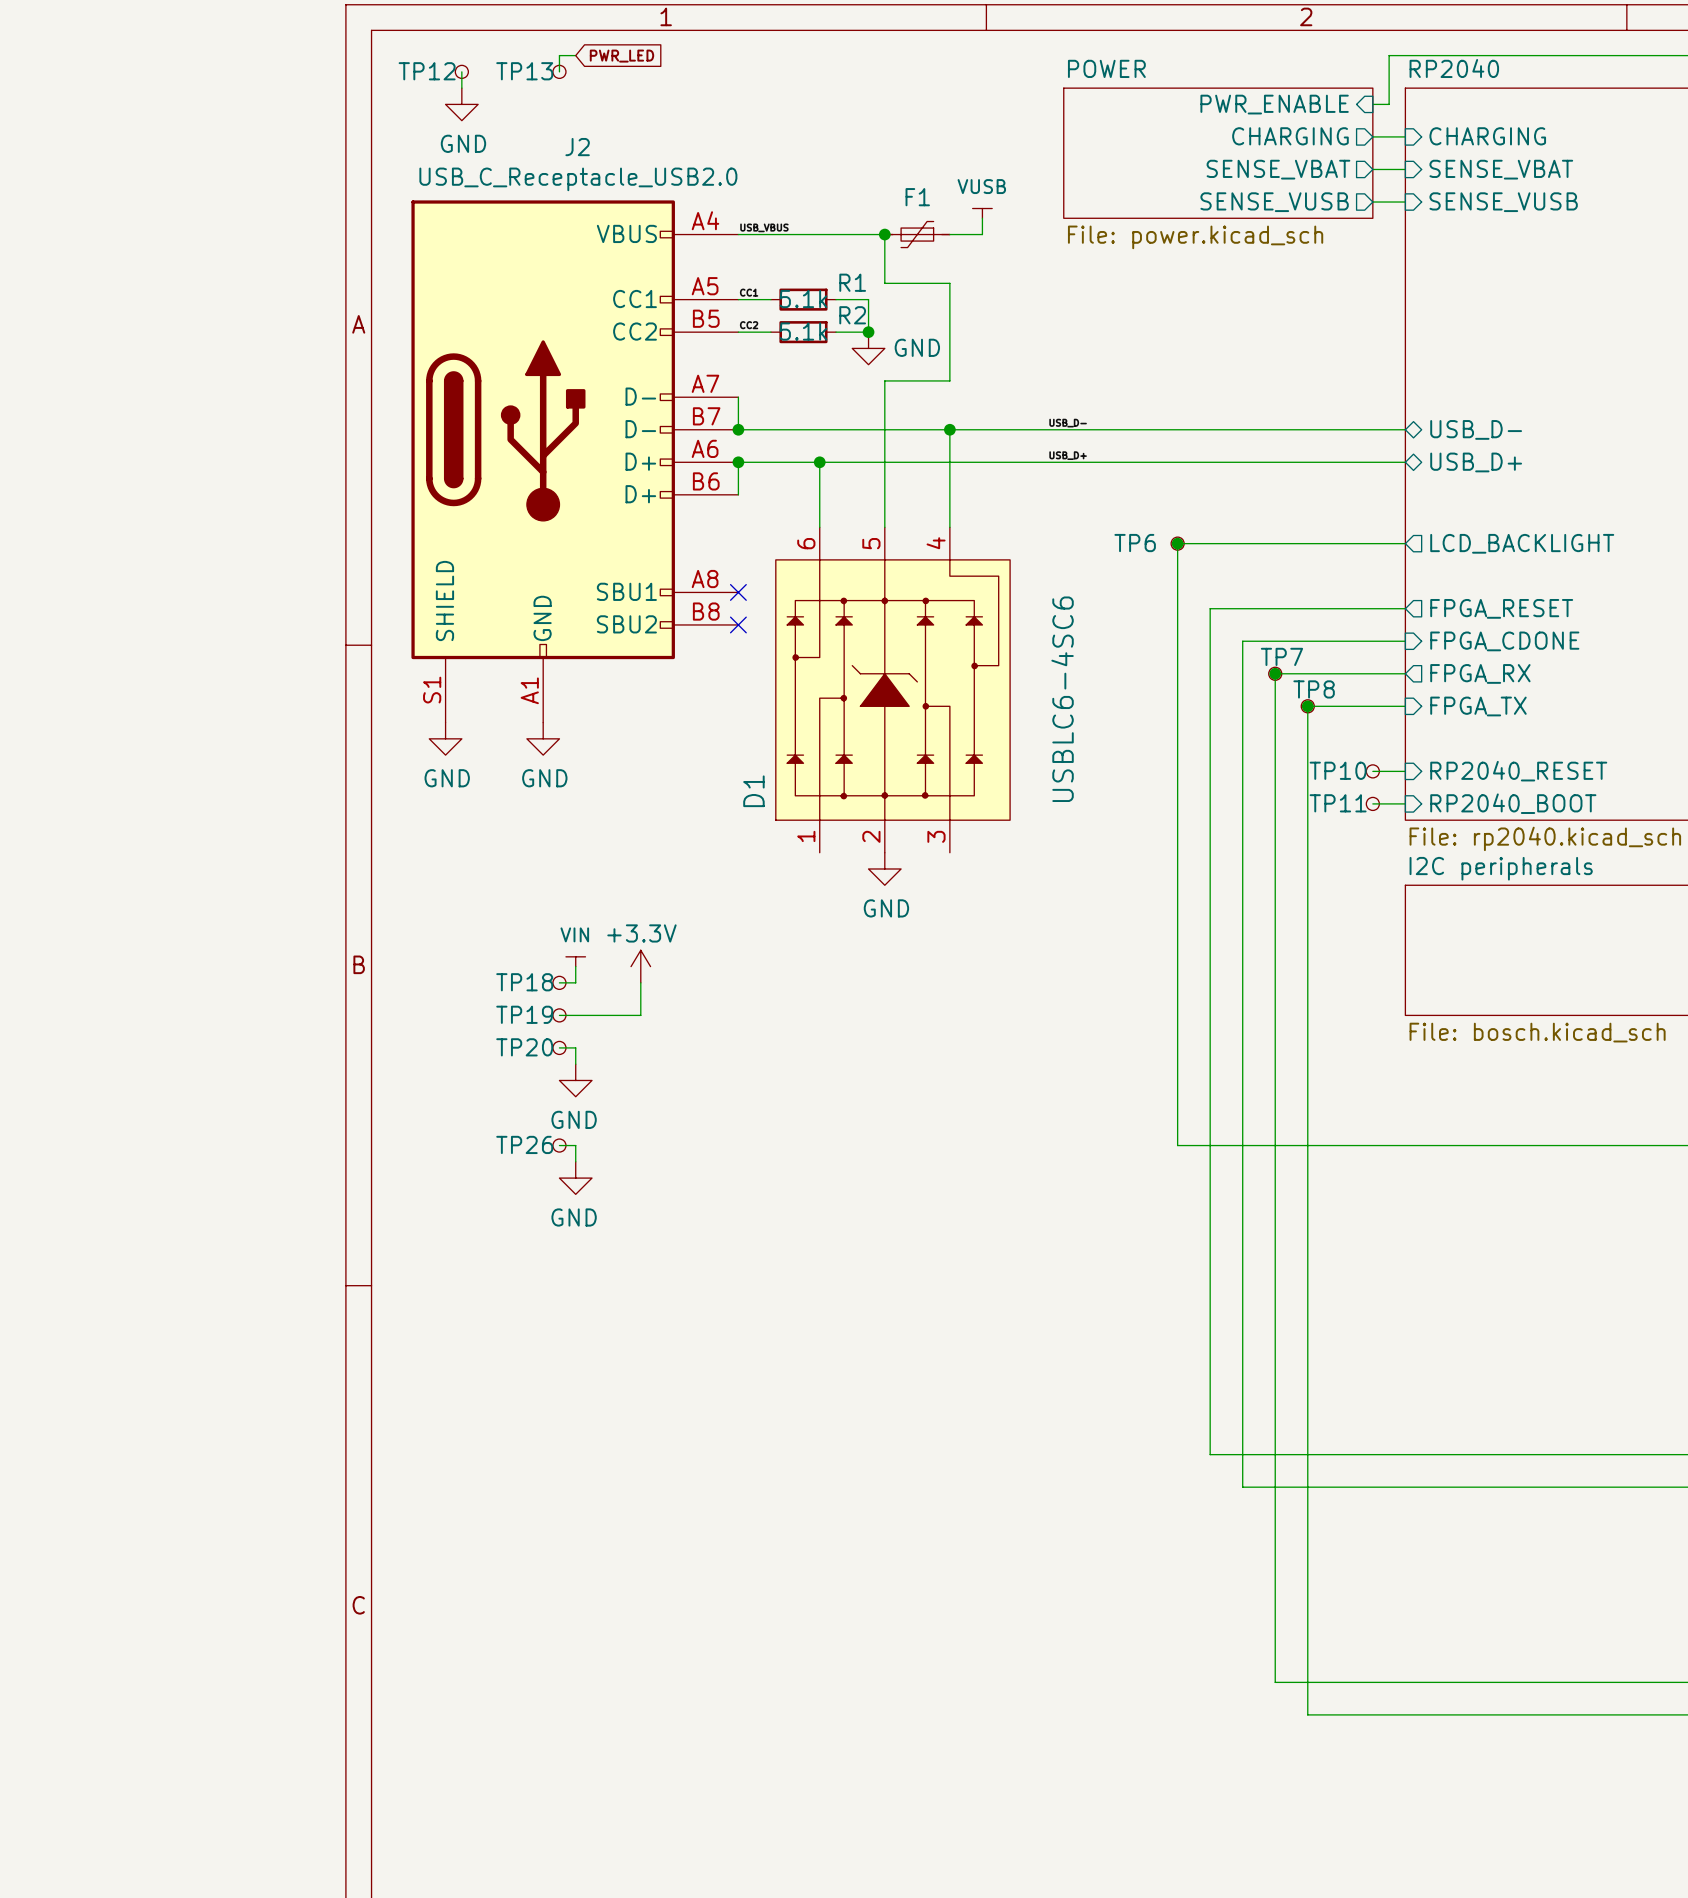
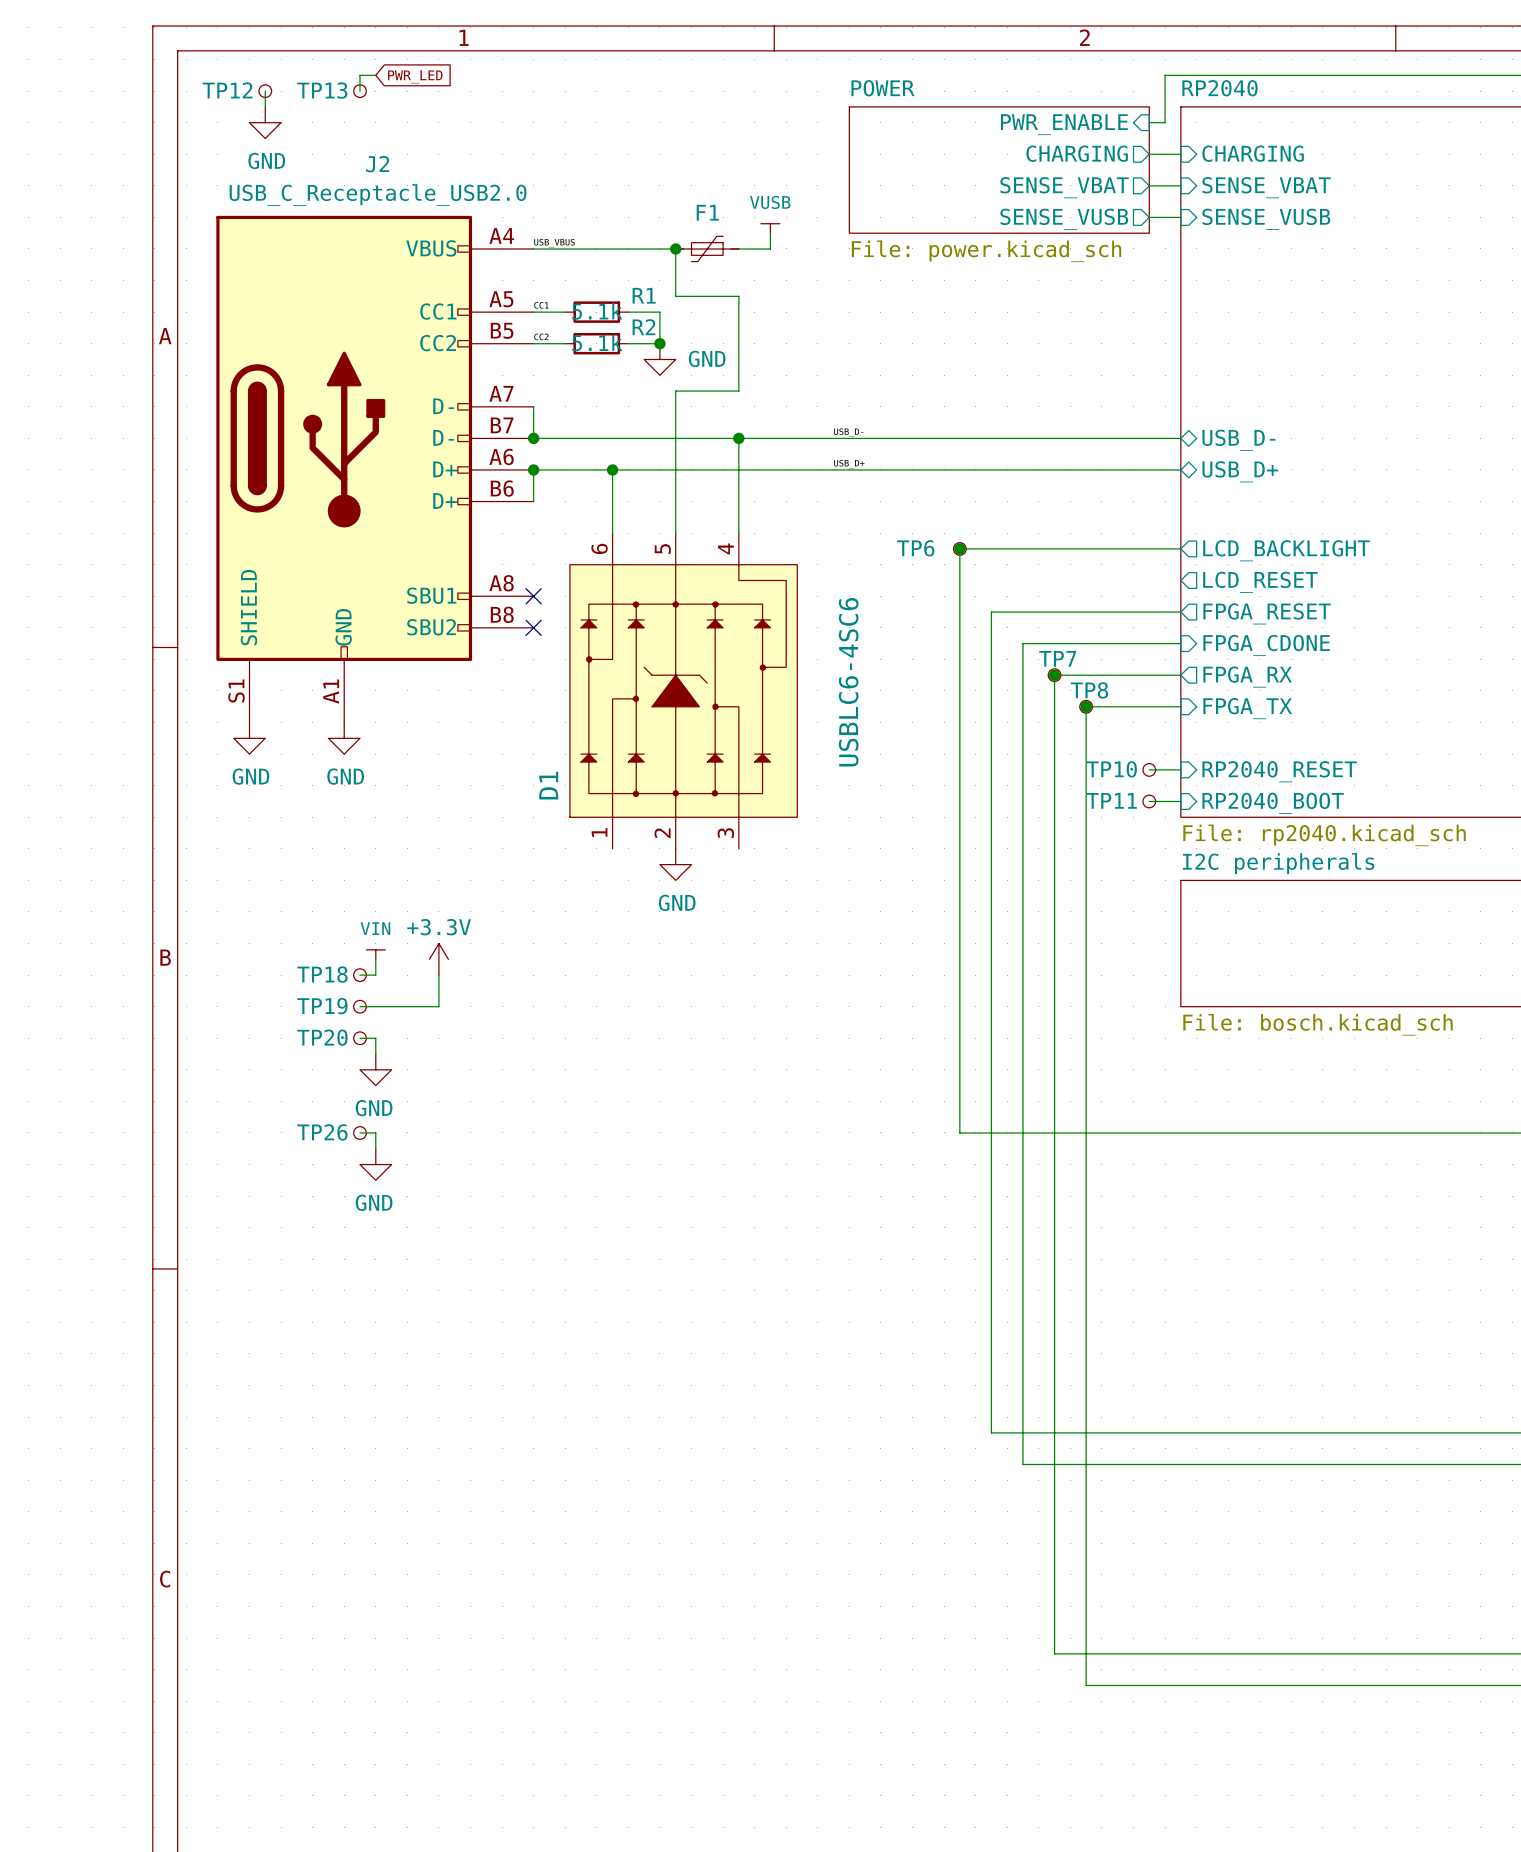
sheet pin: none -> LCD_RESET (1260, 582)

